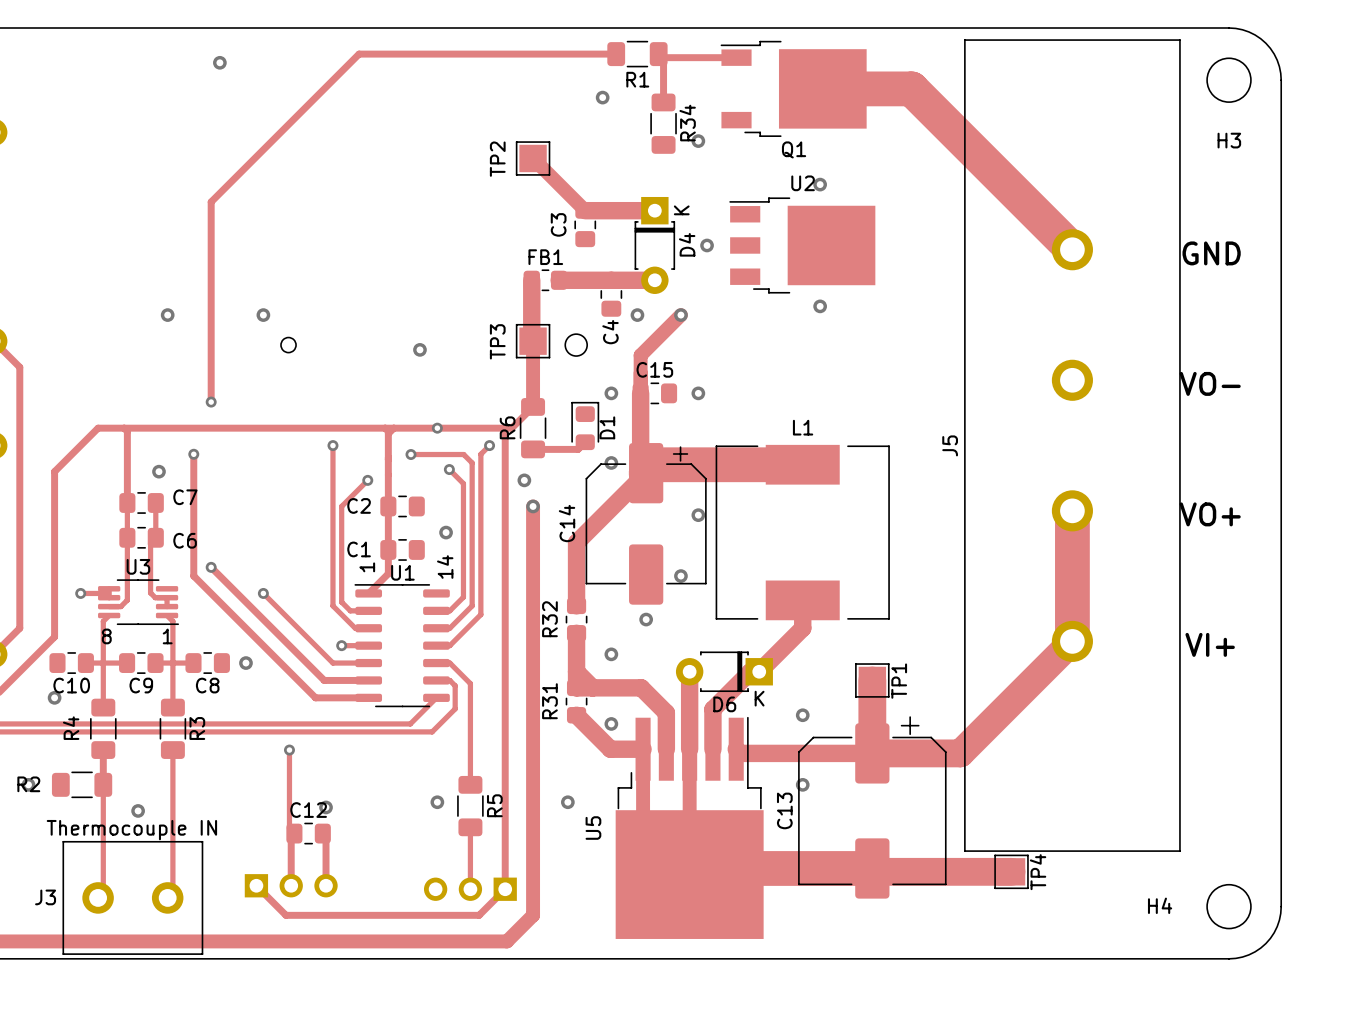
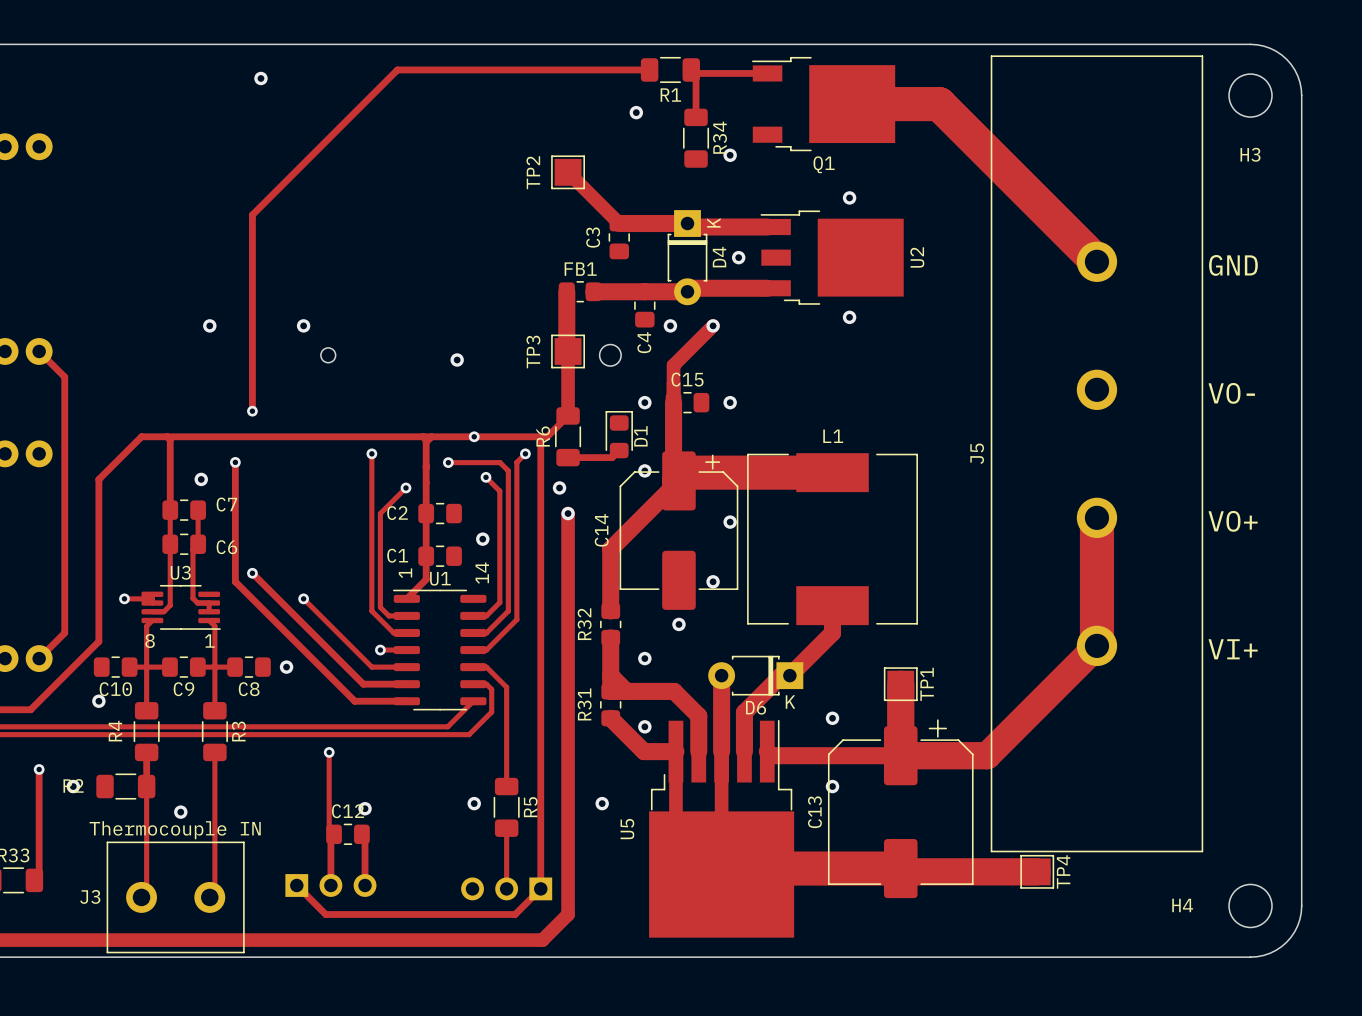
U2 name rotation: 0° (803, 183) -> 90° counterclockwise (917, 257)
U2 name position: U2 (803, 183) -> U2 (917, 257)
track: none -> (690, 227) (767, 227)
track: none -> (690, 288) (767, 288)

